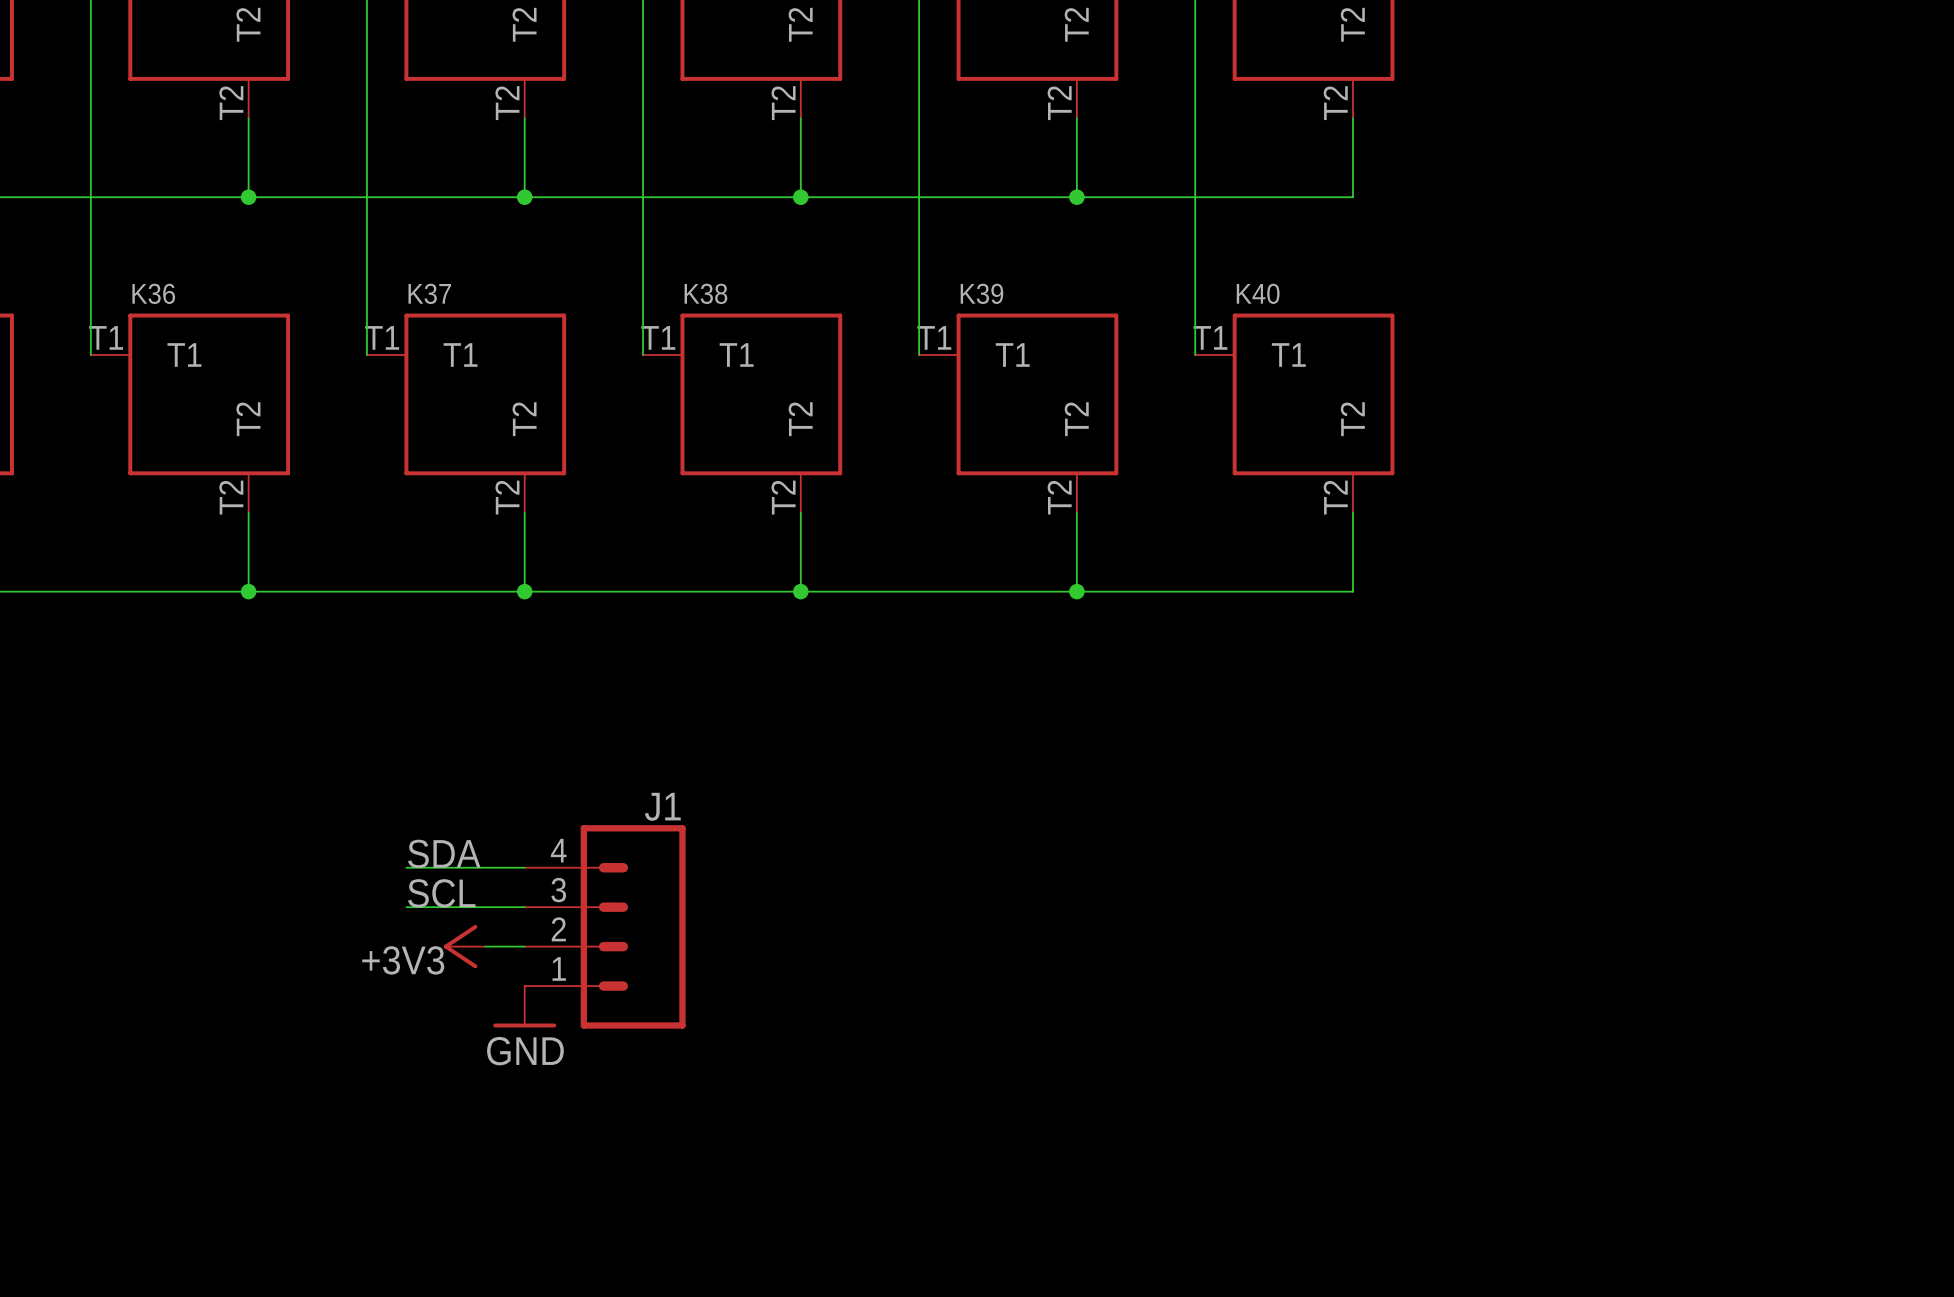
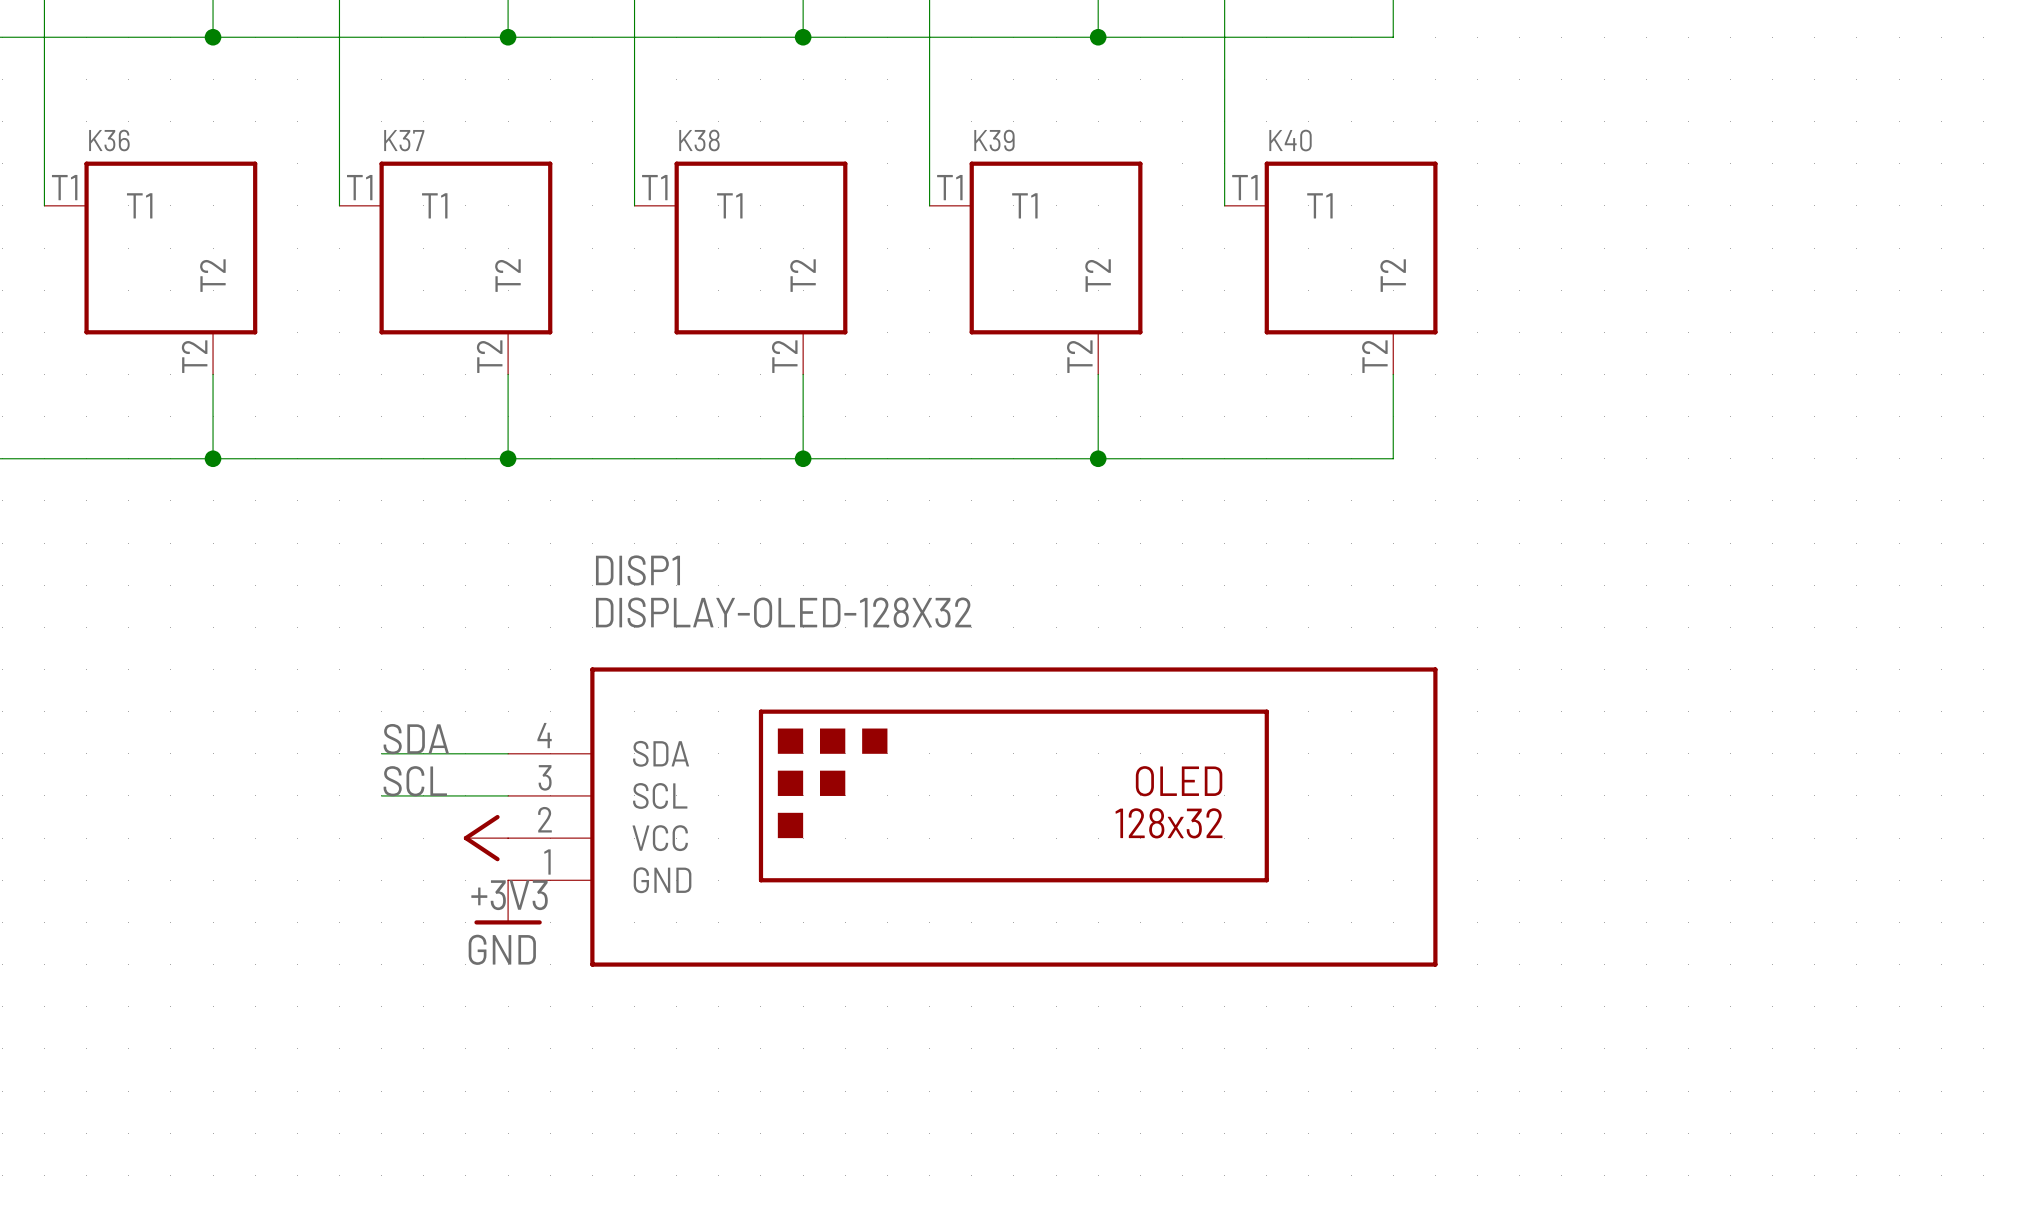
J1: (605, 926) -> none
DISP1: none -> DISPLAY-OLED-128X32 (972, 817)
power symbol position: +3V3 (464, 946) -> +3V3 (485, 838)
power symbol text position: +3V3 (403, 960) -> +3V3 (509, 895)

